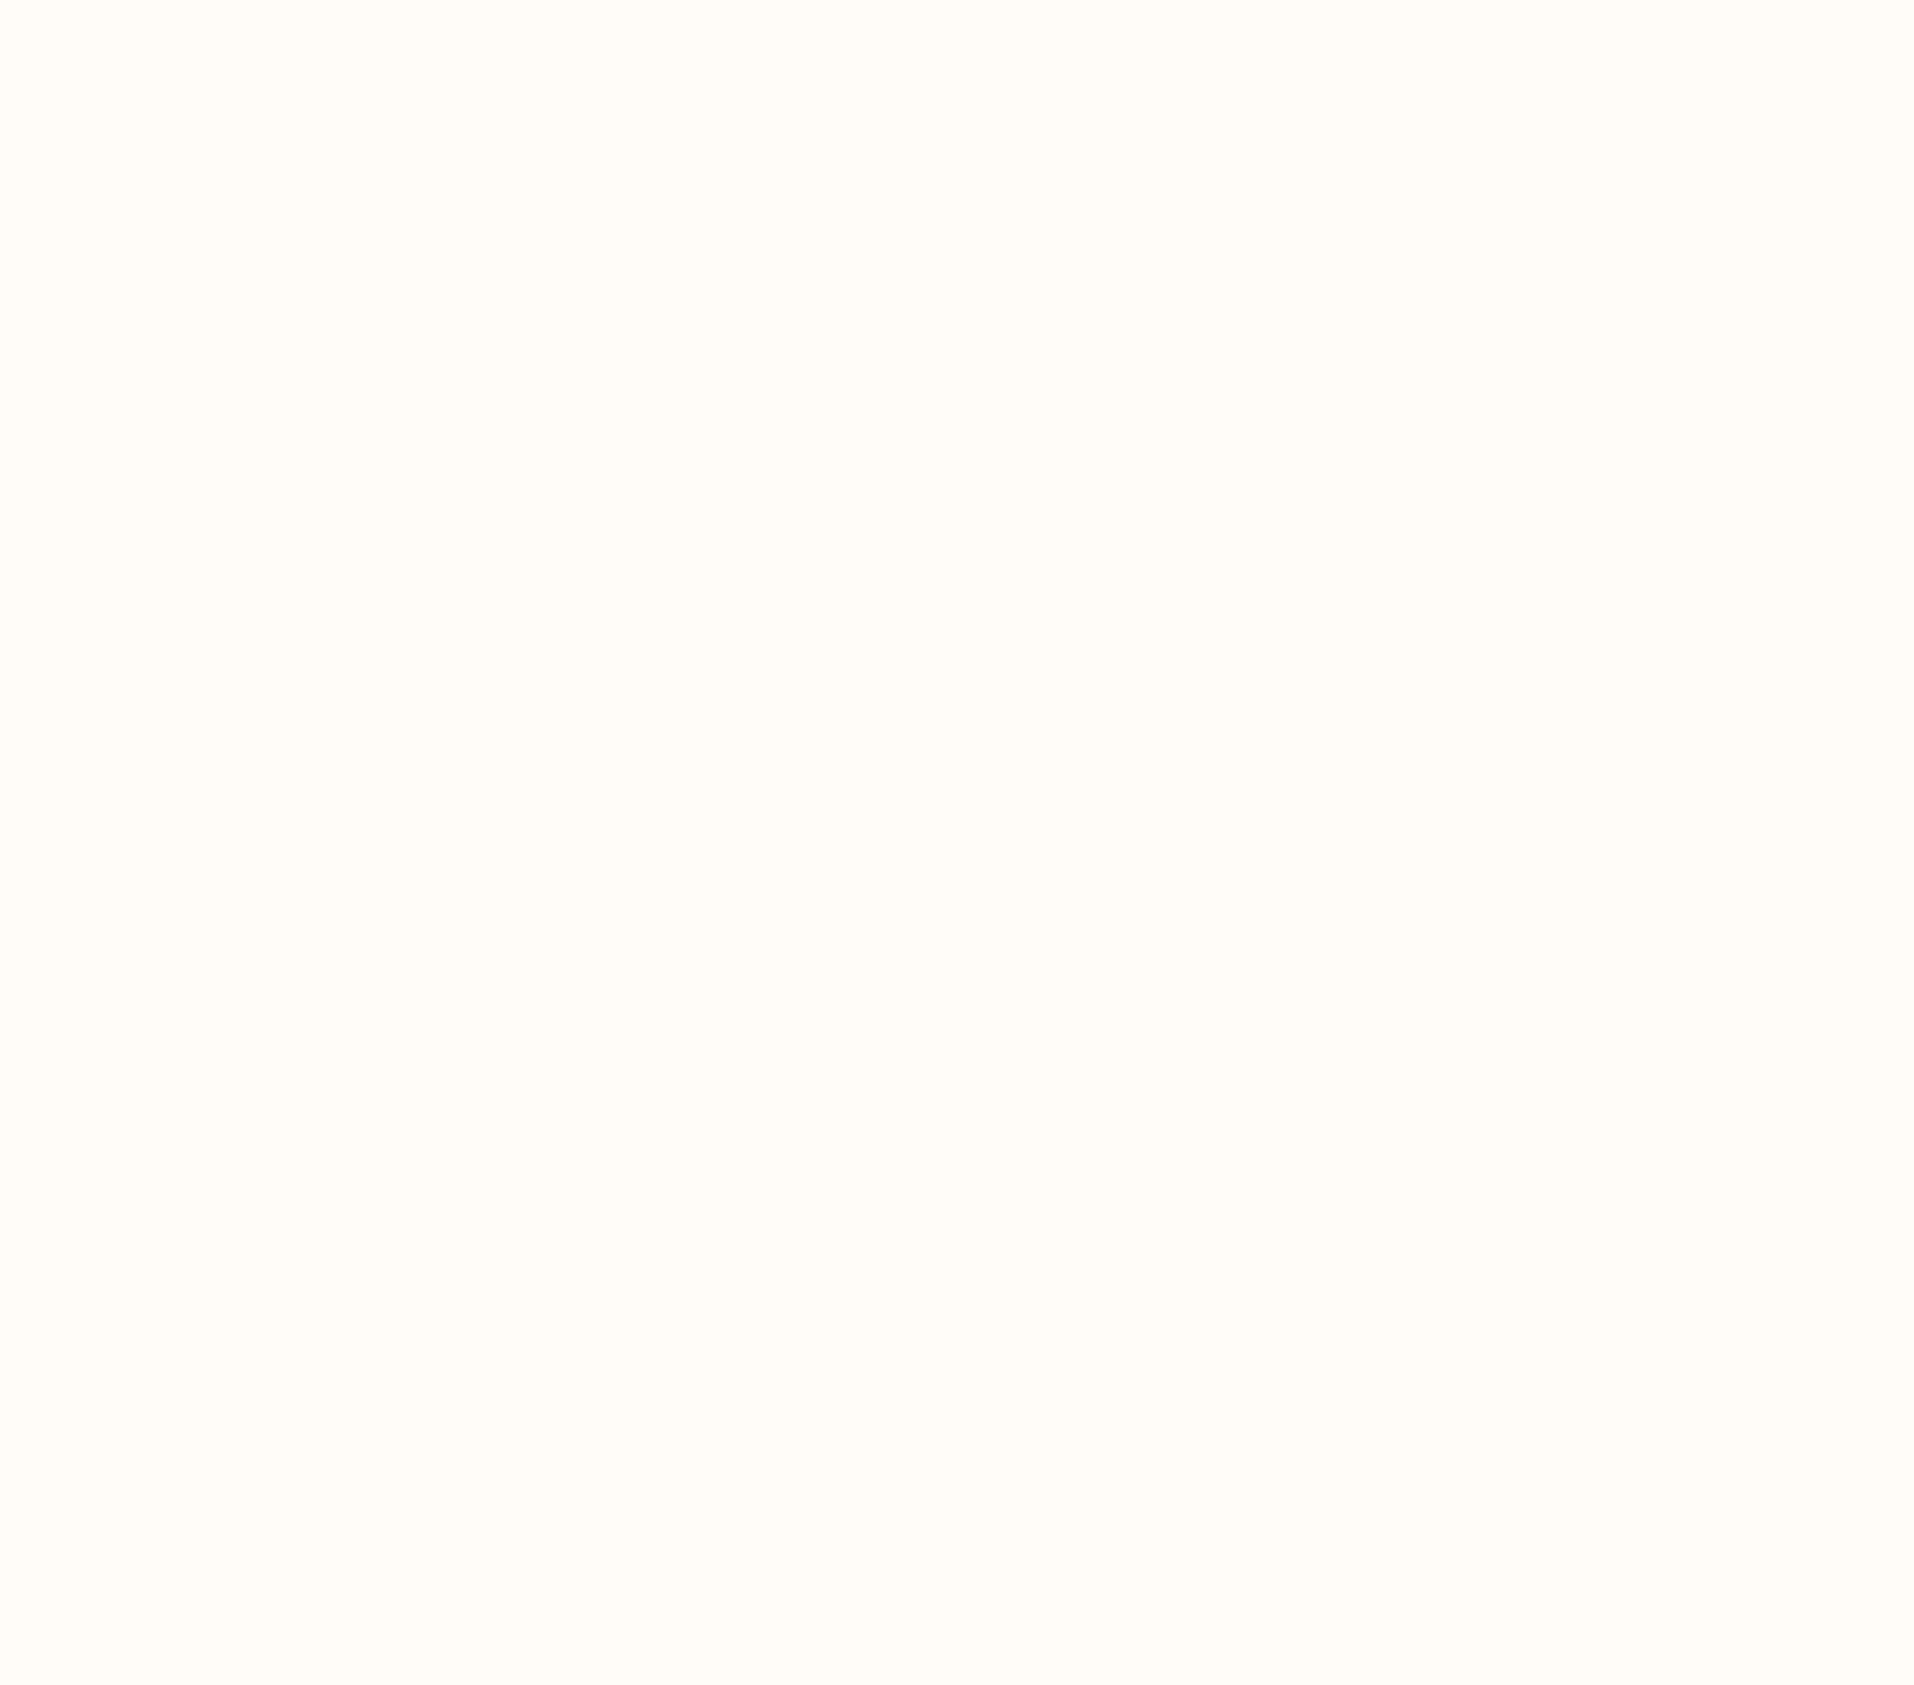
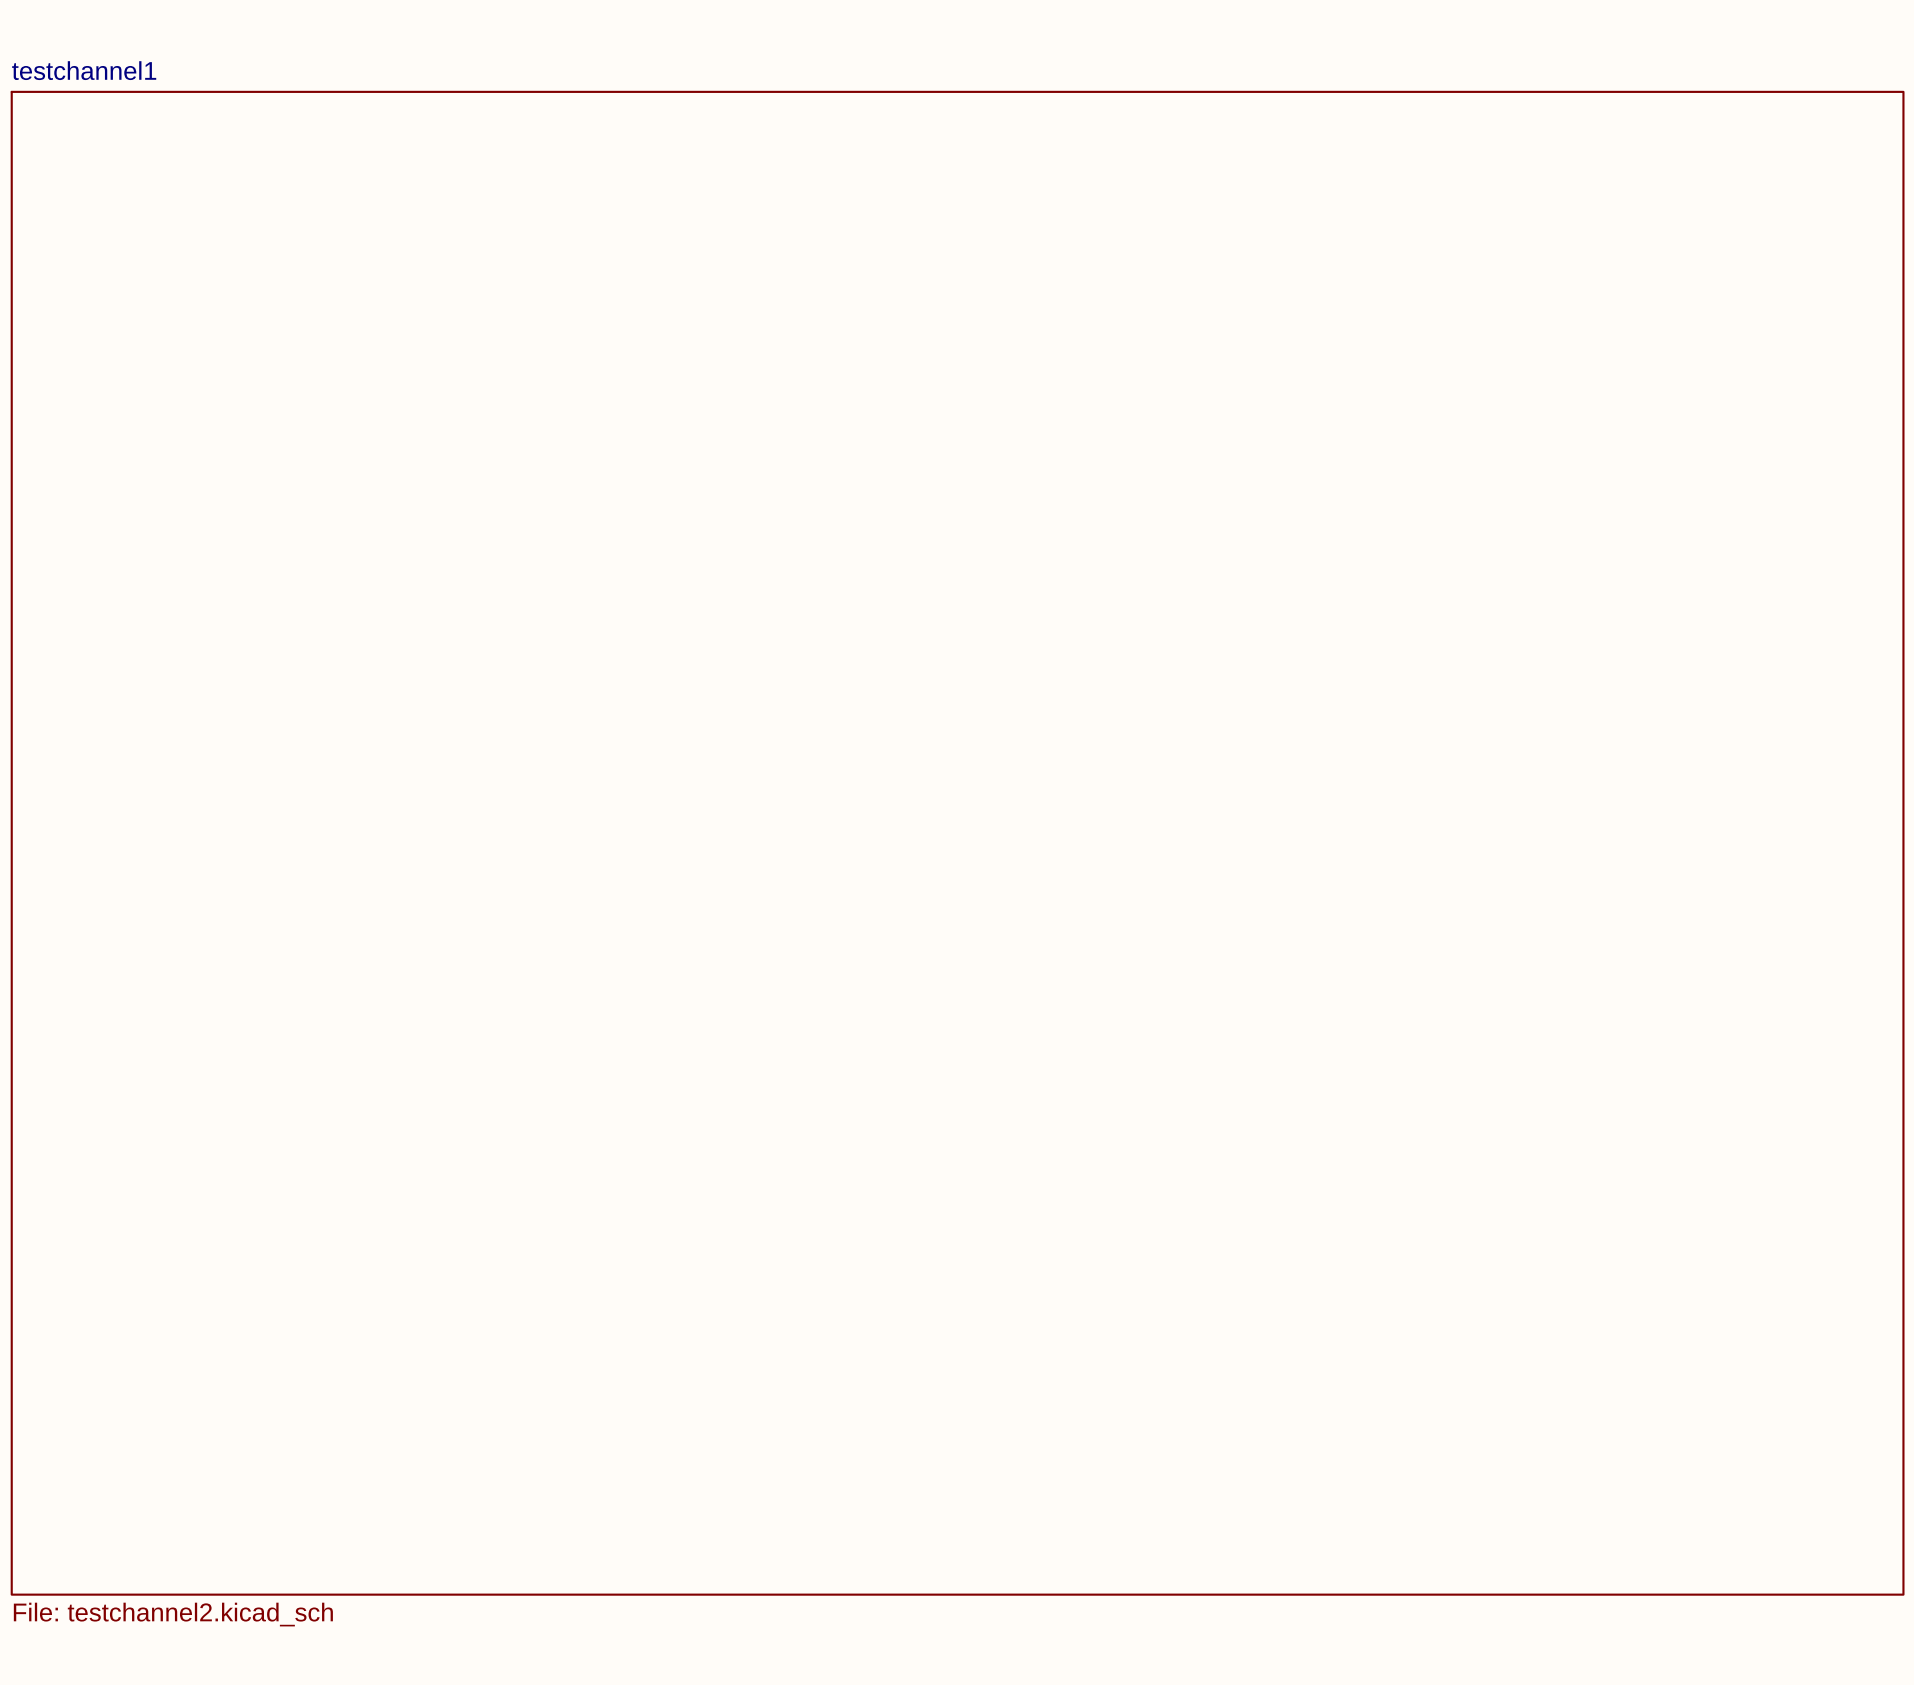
sheet testchannel1: none -> File: testchannel2.kicad_sch (957, 843)

